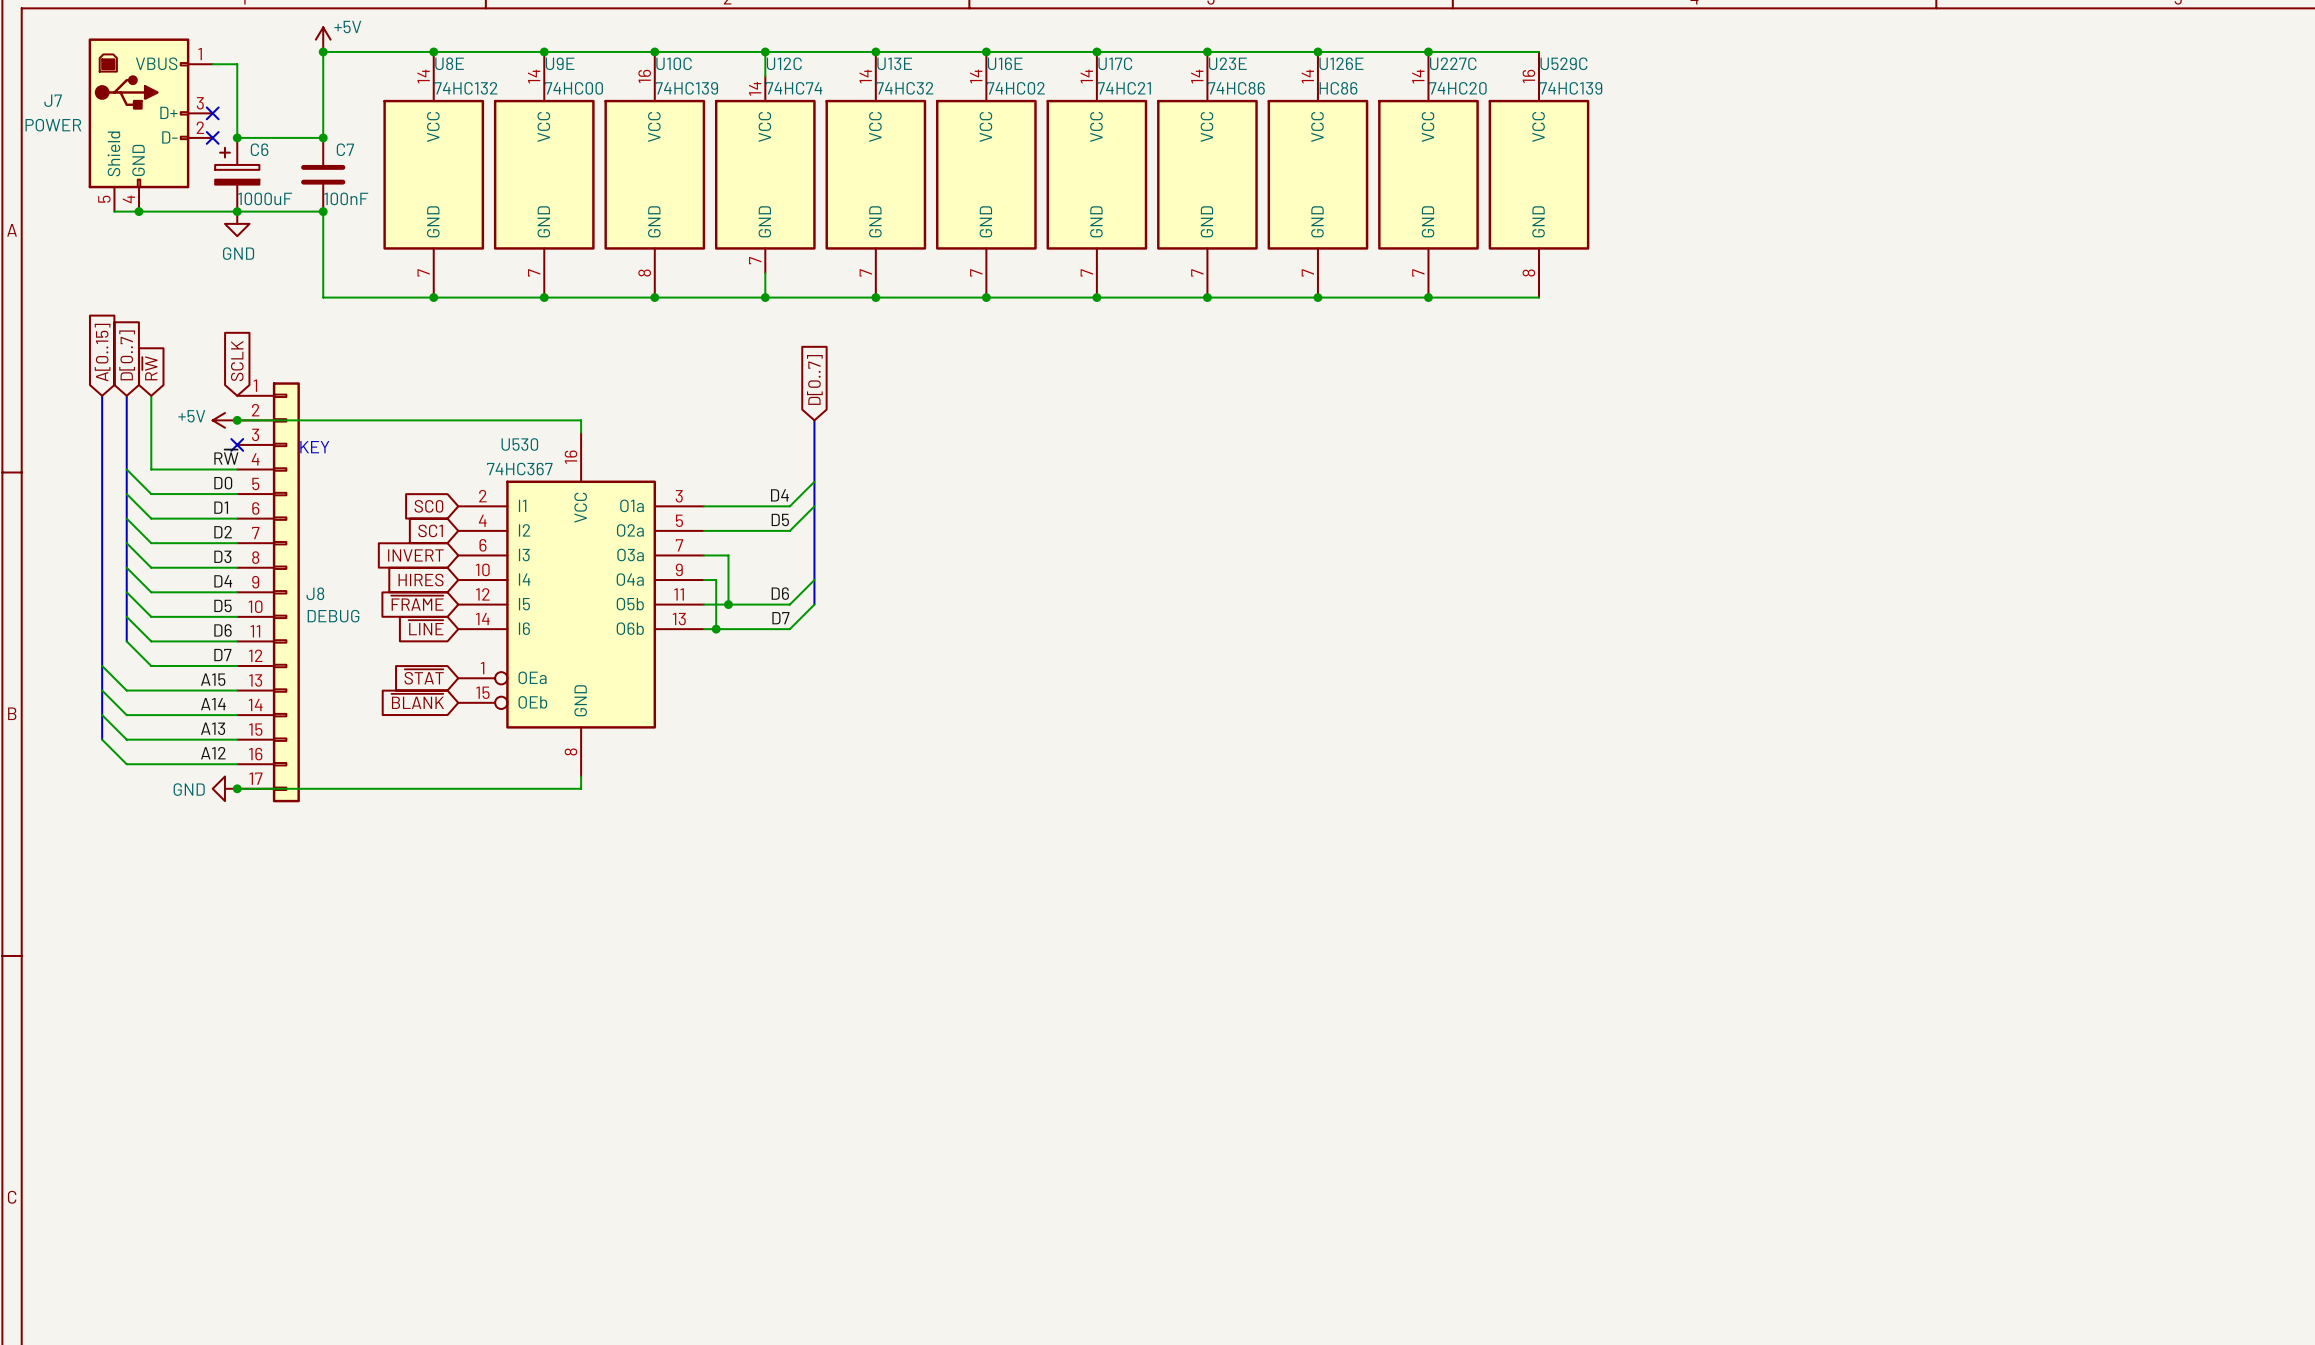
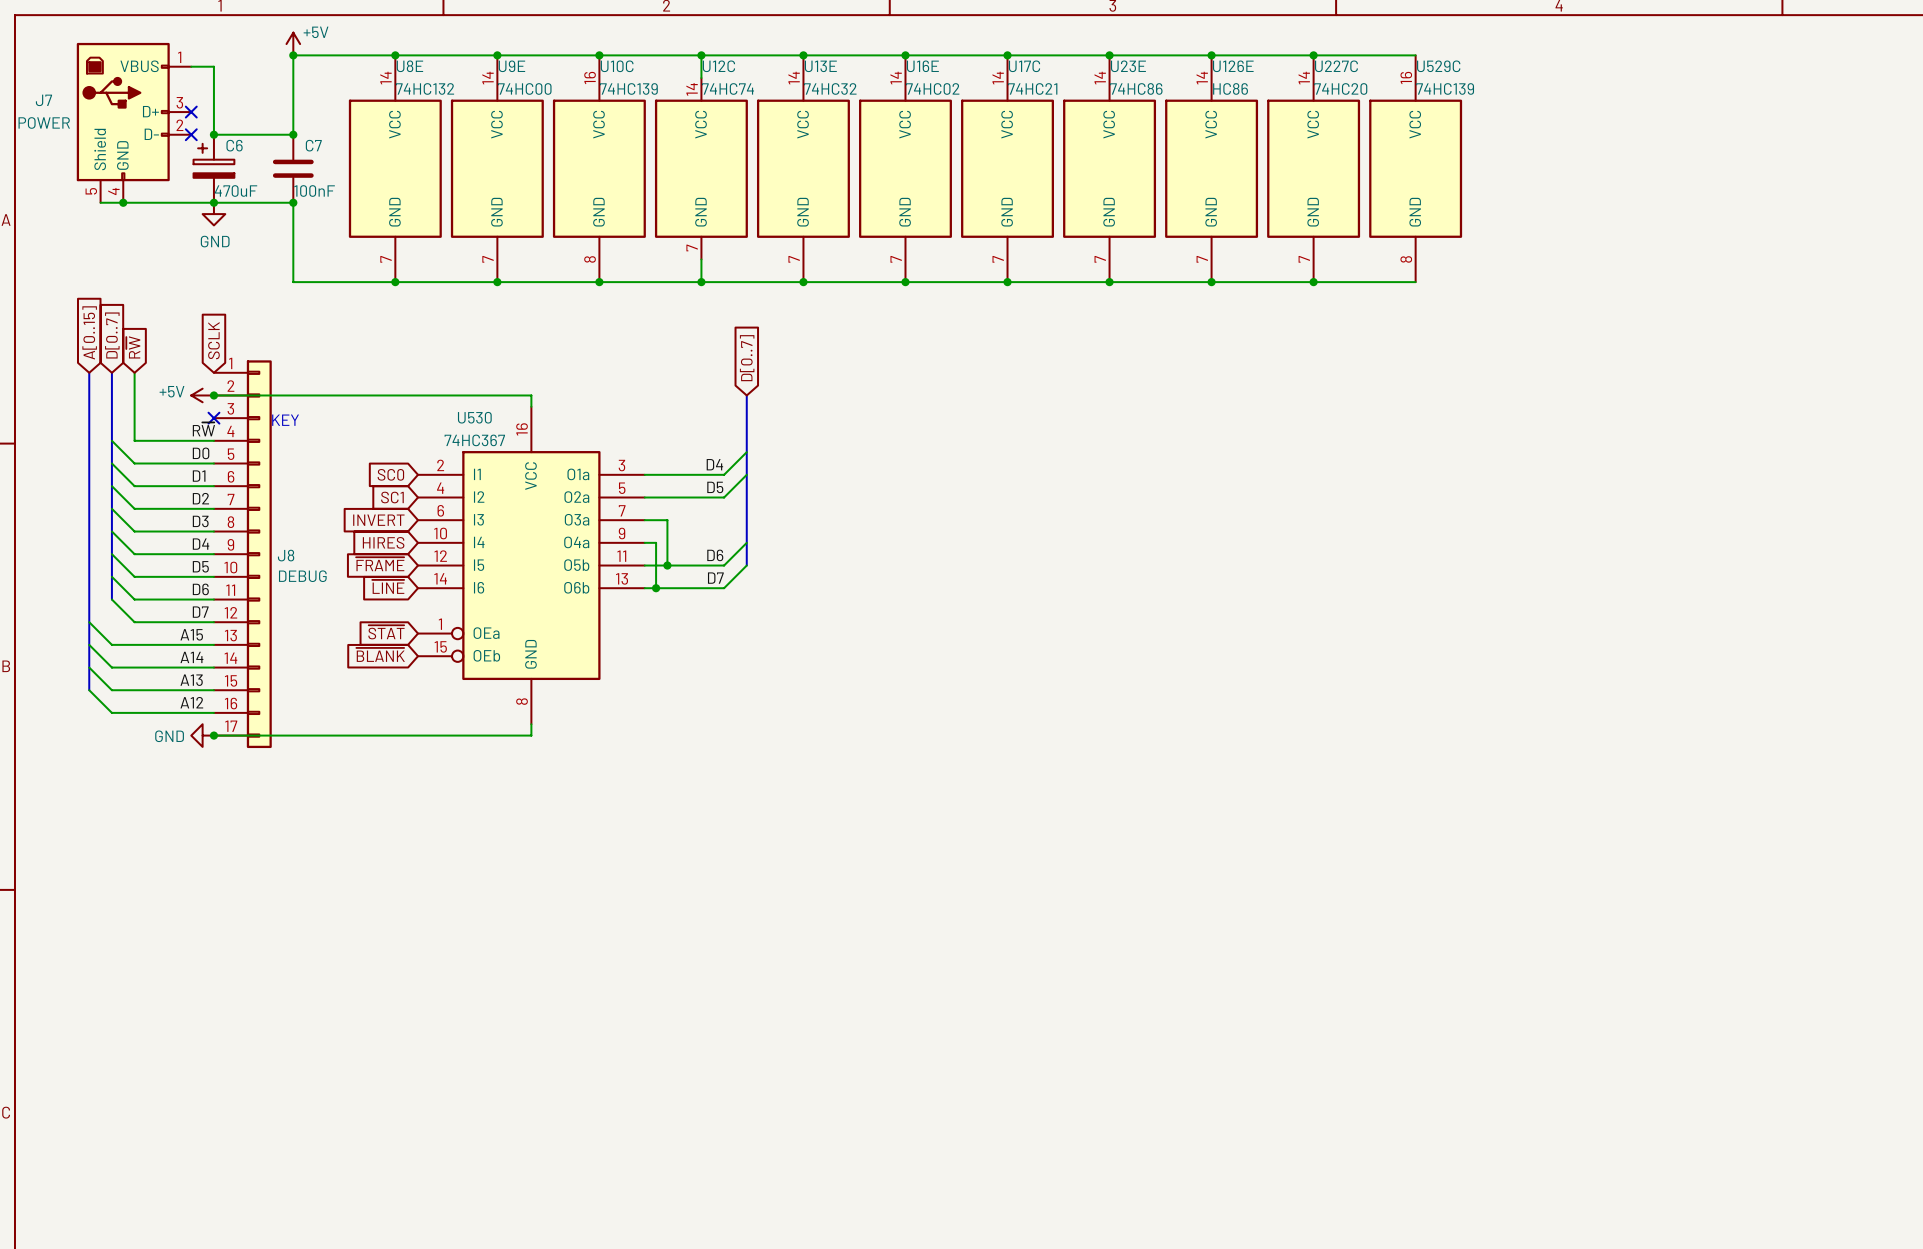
C6 value: 1000uF (265, 198) -> 470uF (235, 191)

